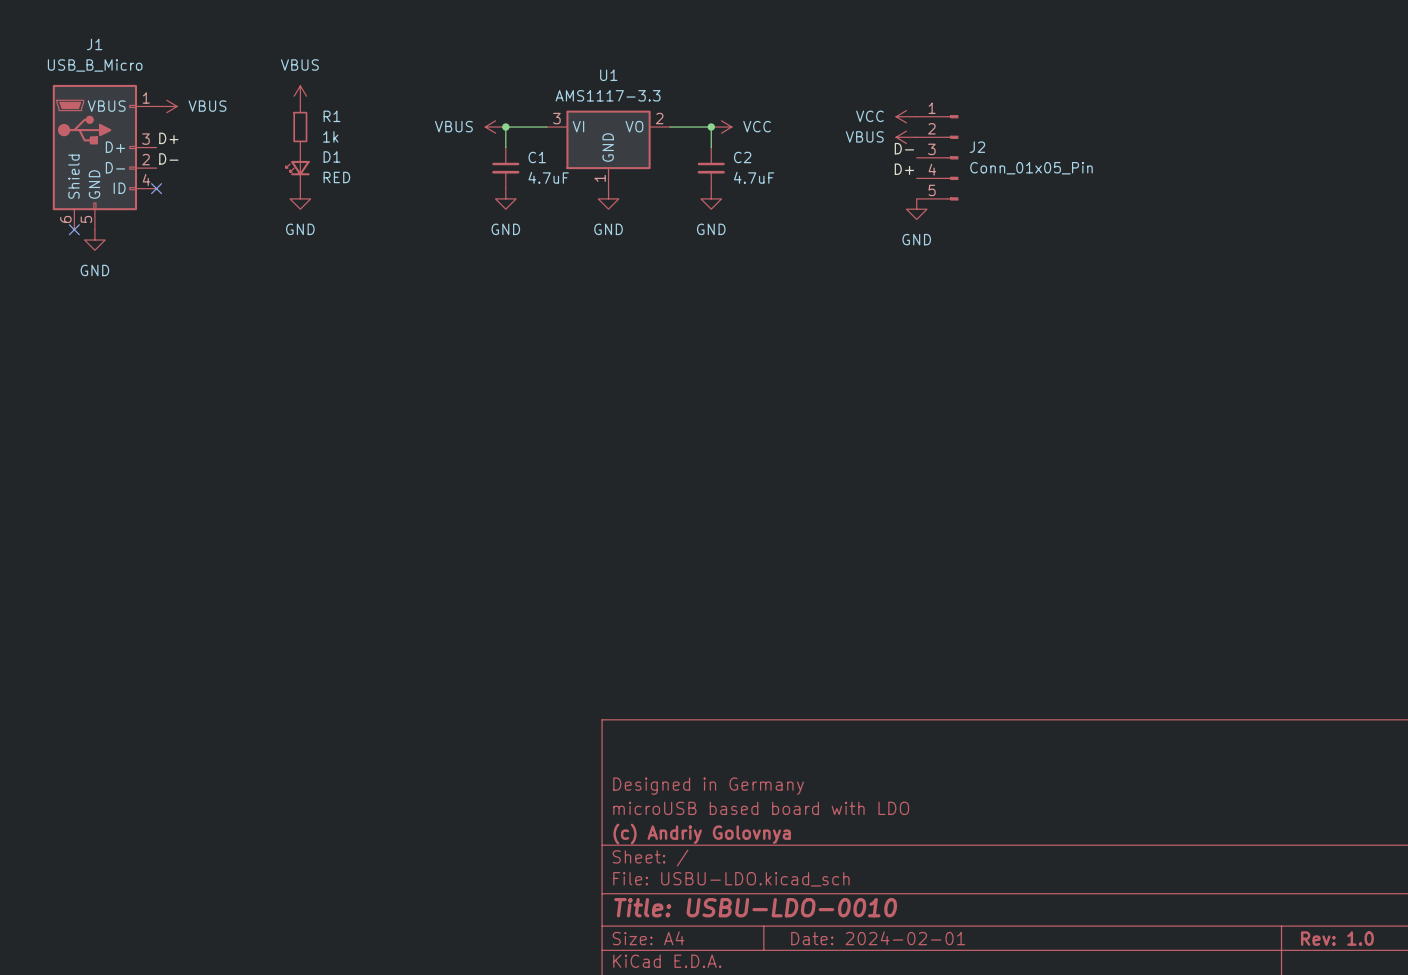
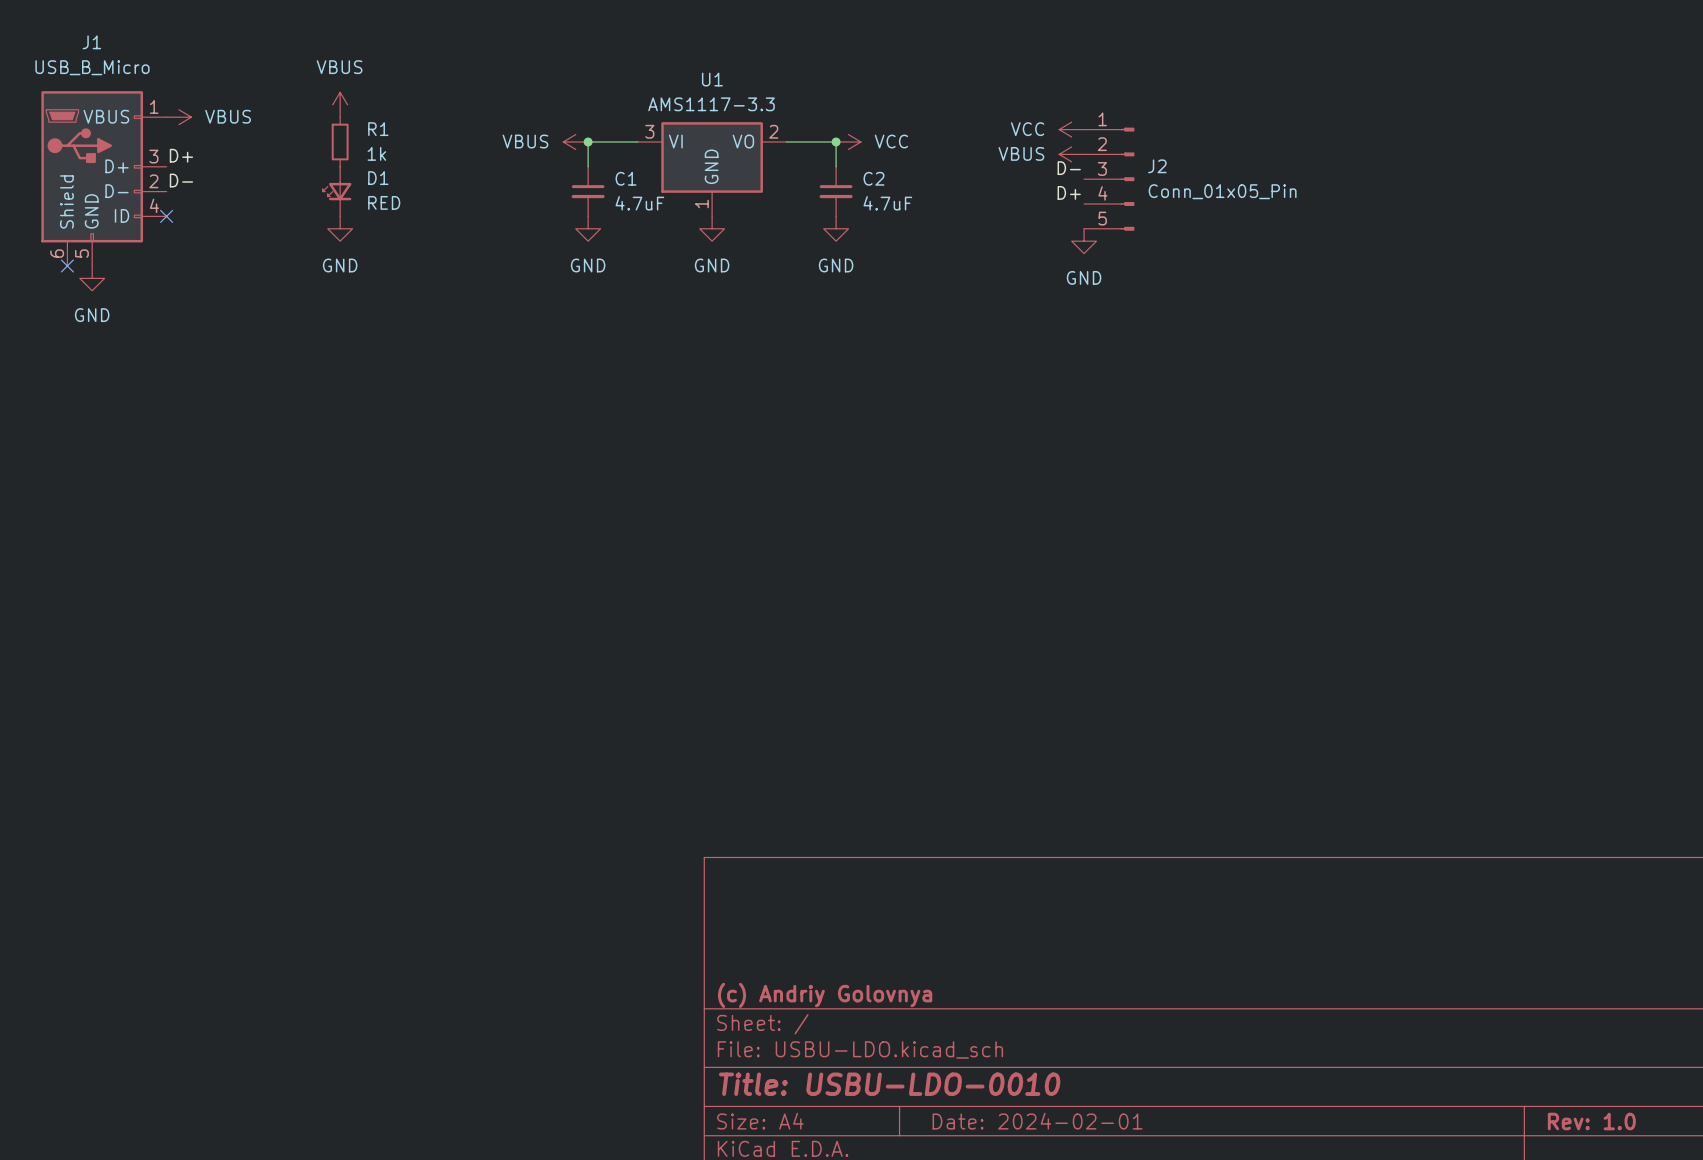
title block: Designed in Germany (708, 786) -> none
title block: microUSB based board with LDO (761, 808) -> none

